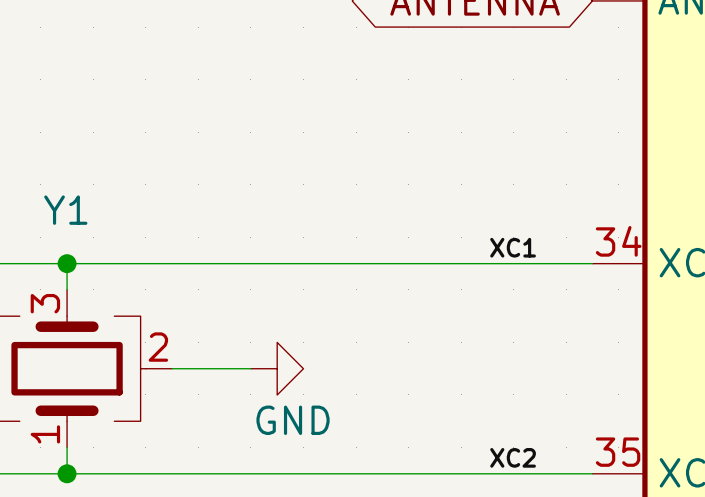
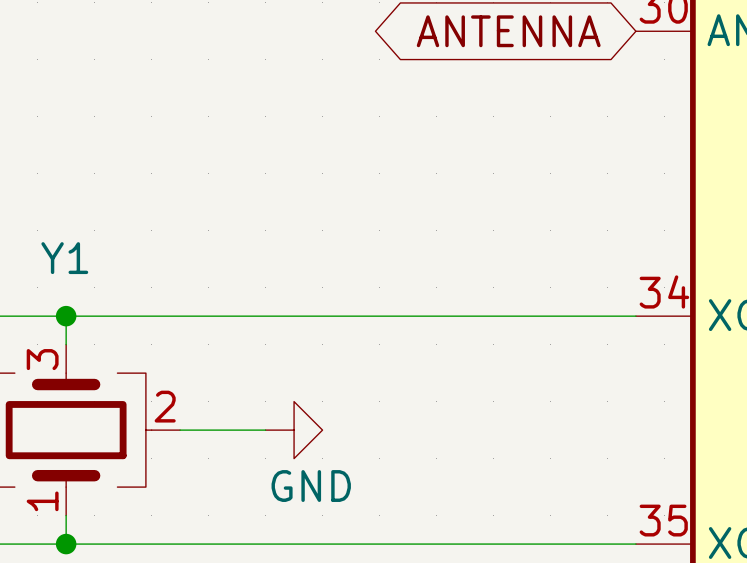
label: XC1 (513, 247) -> none
label: XC2 (513, 457) -> none

